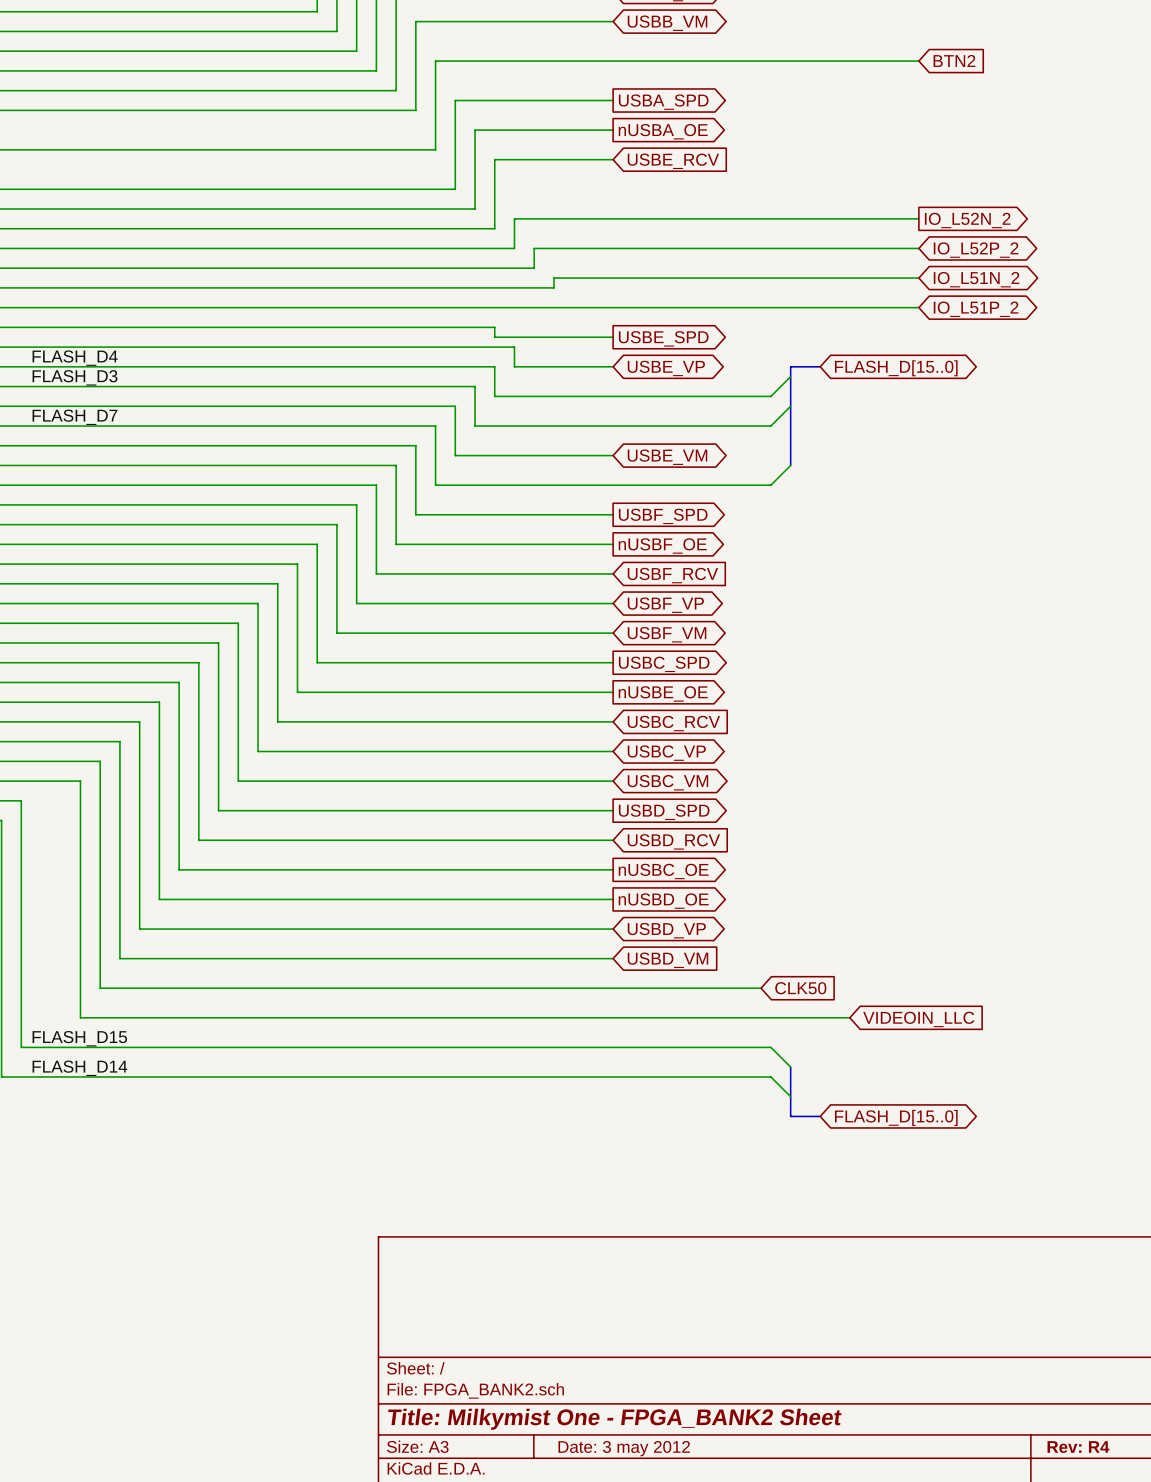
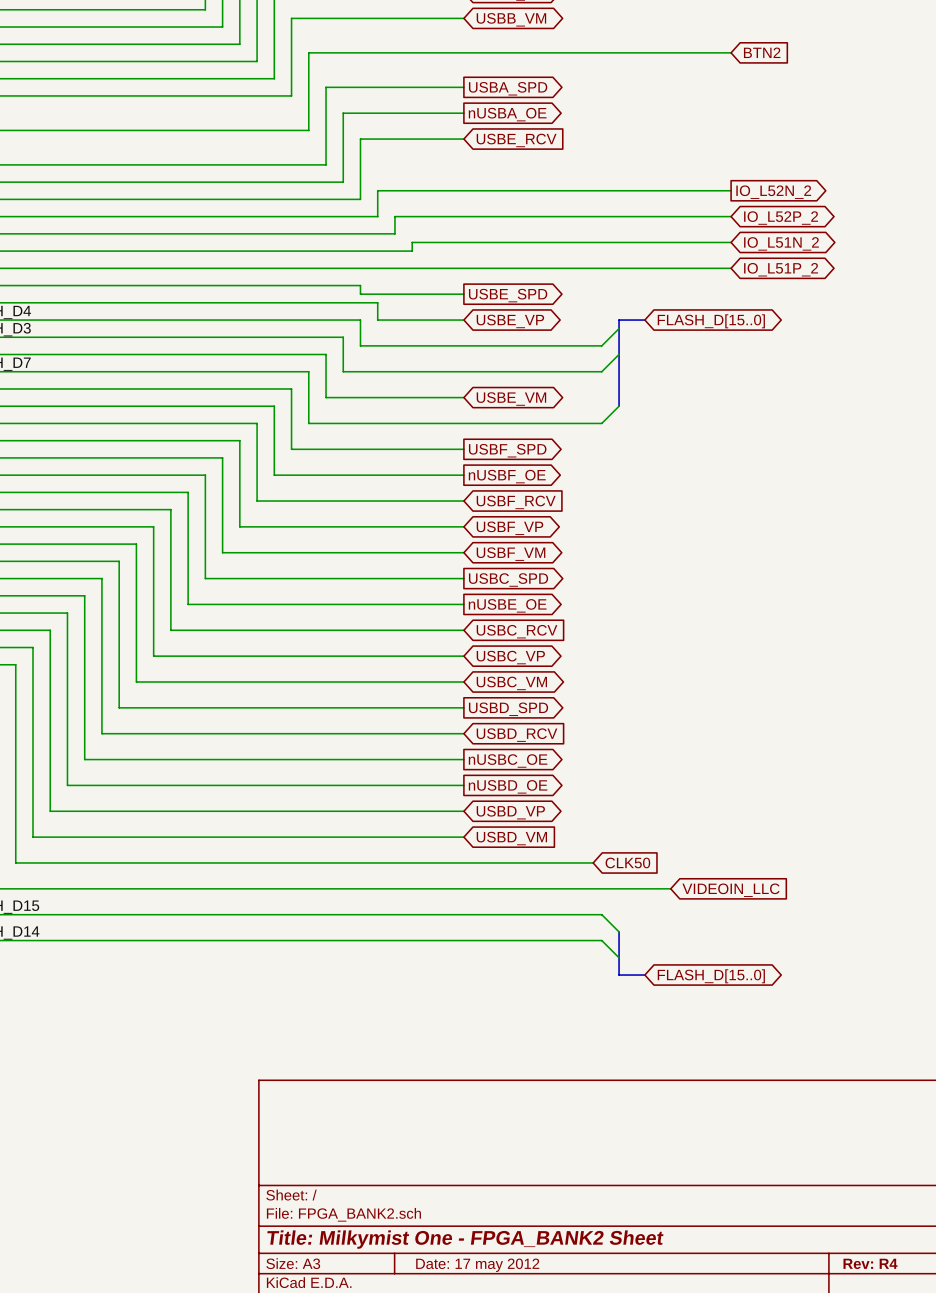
title block: Date: 3 may 2012 (624, 1448) -> Date: 17 may 2012 (477, 1265)

